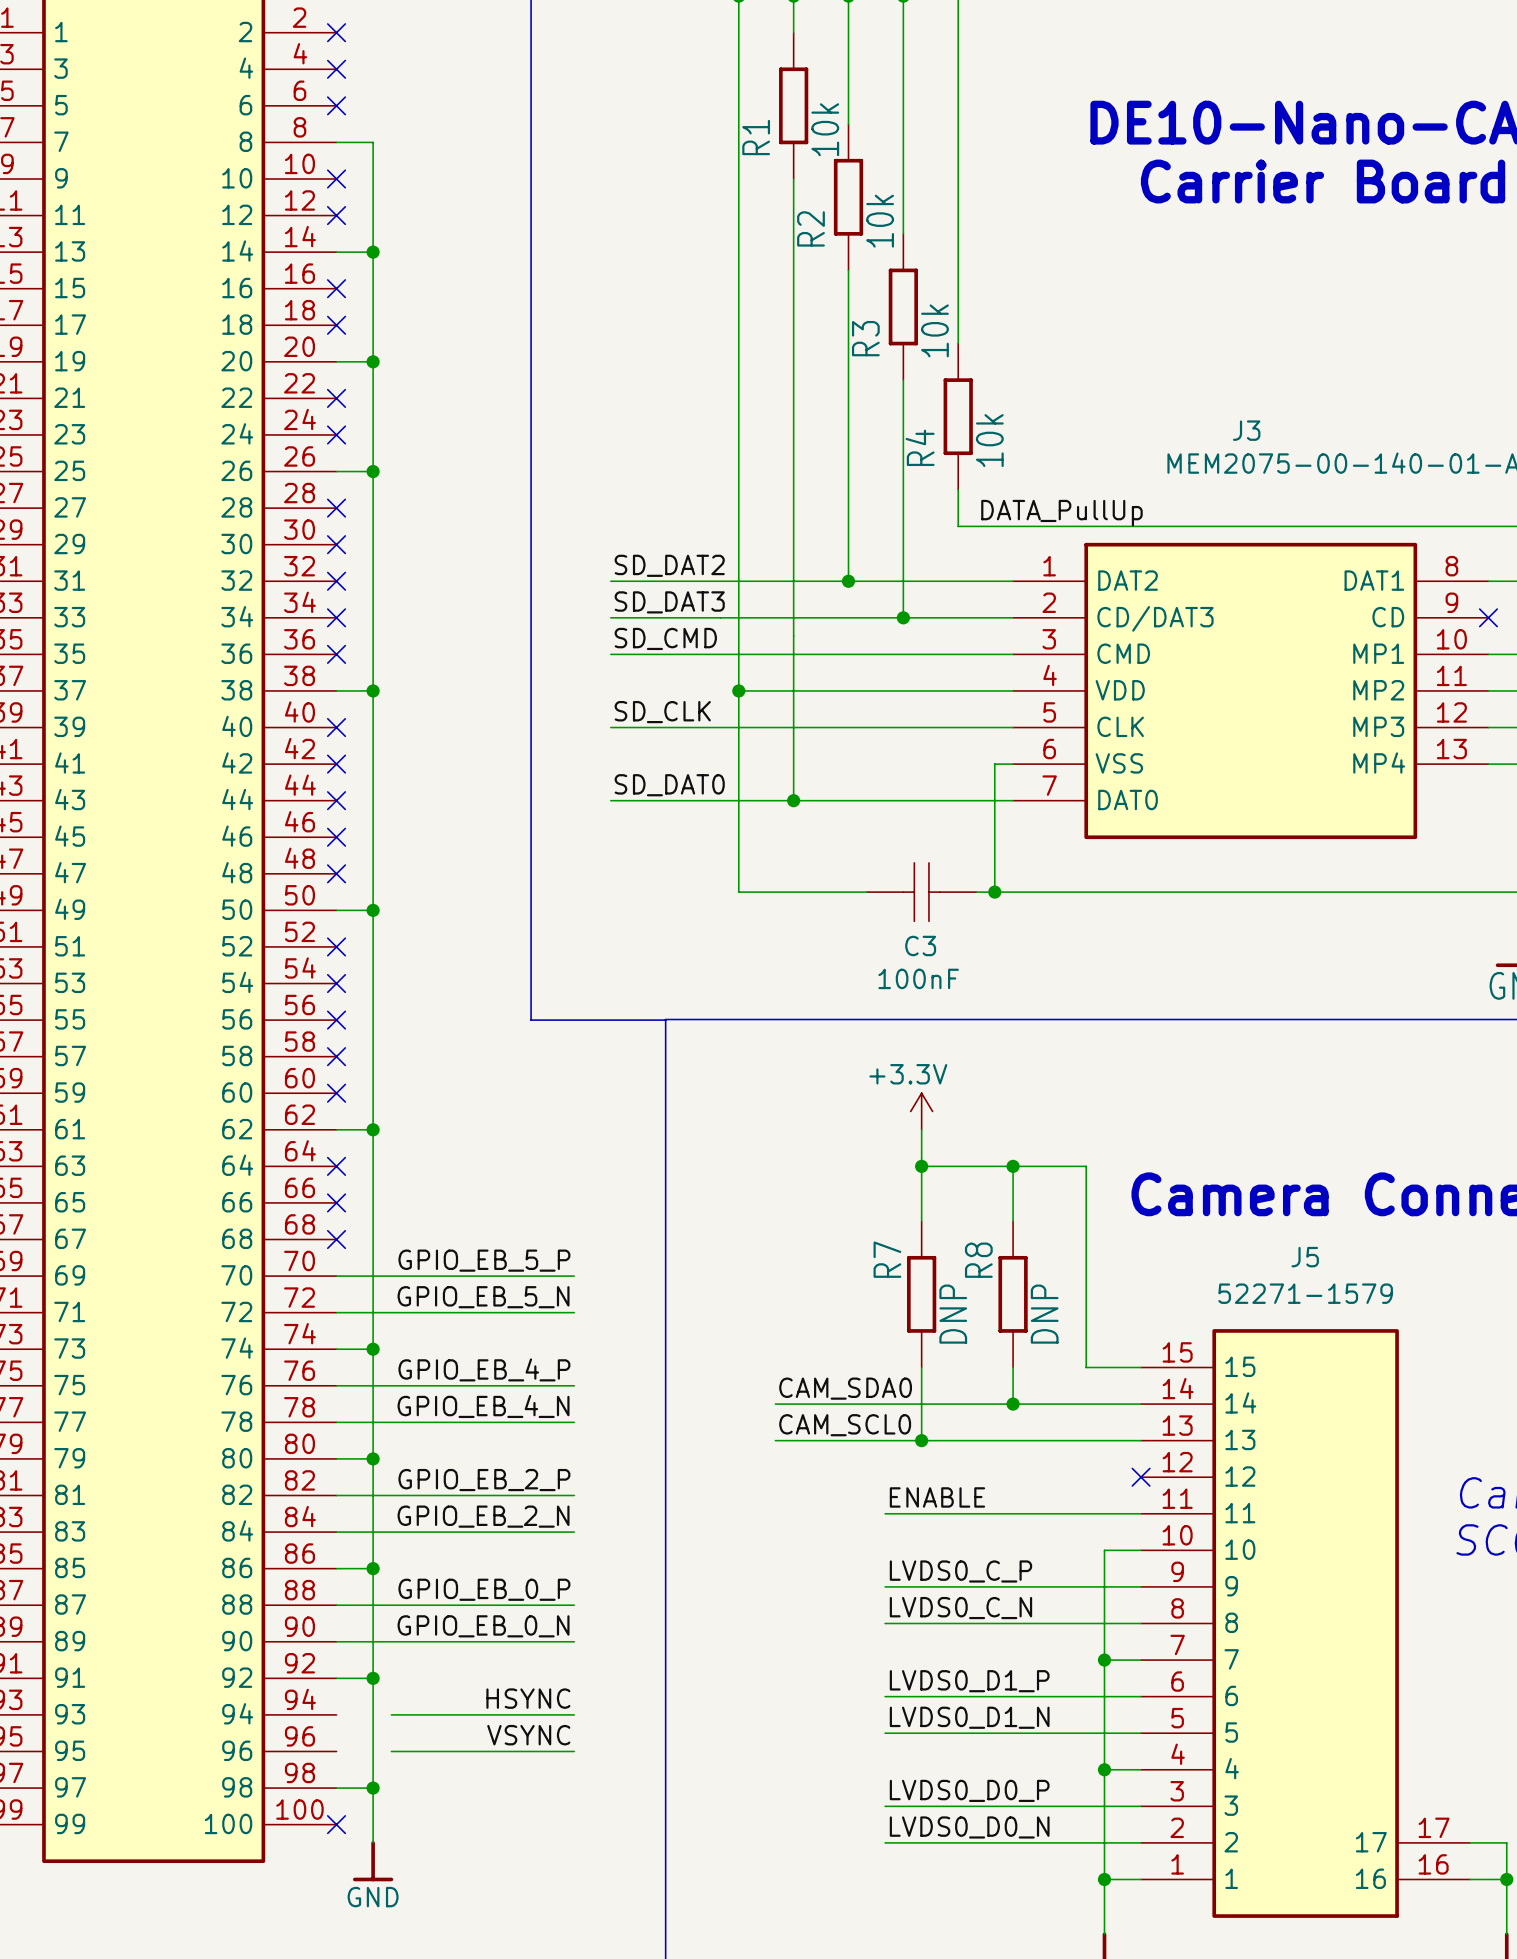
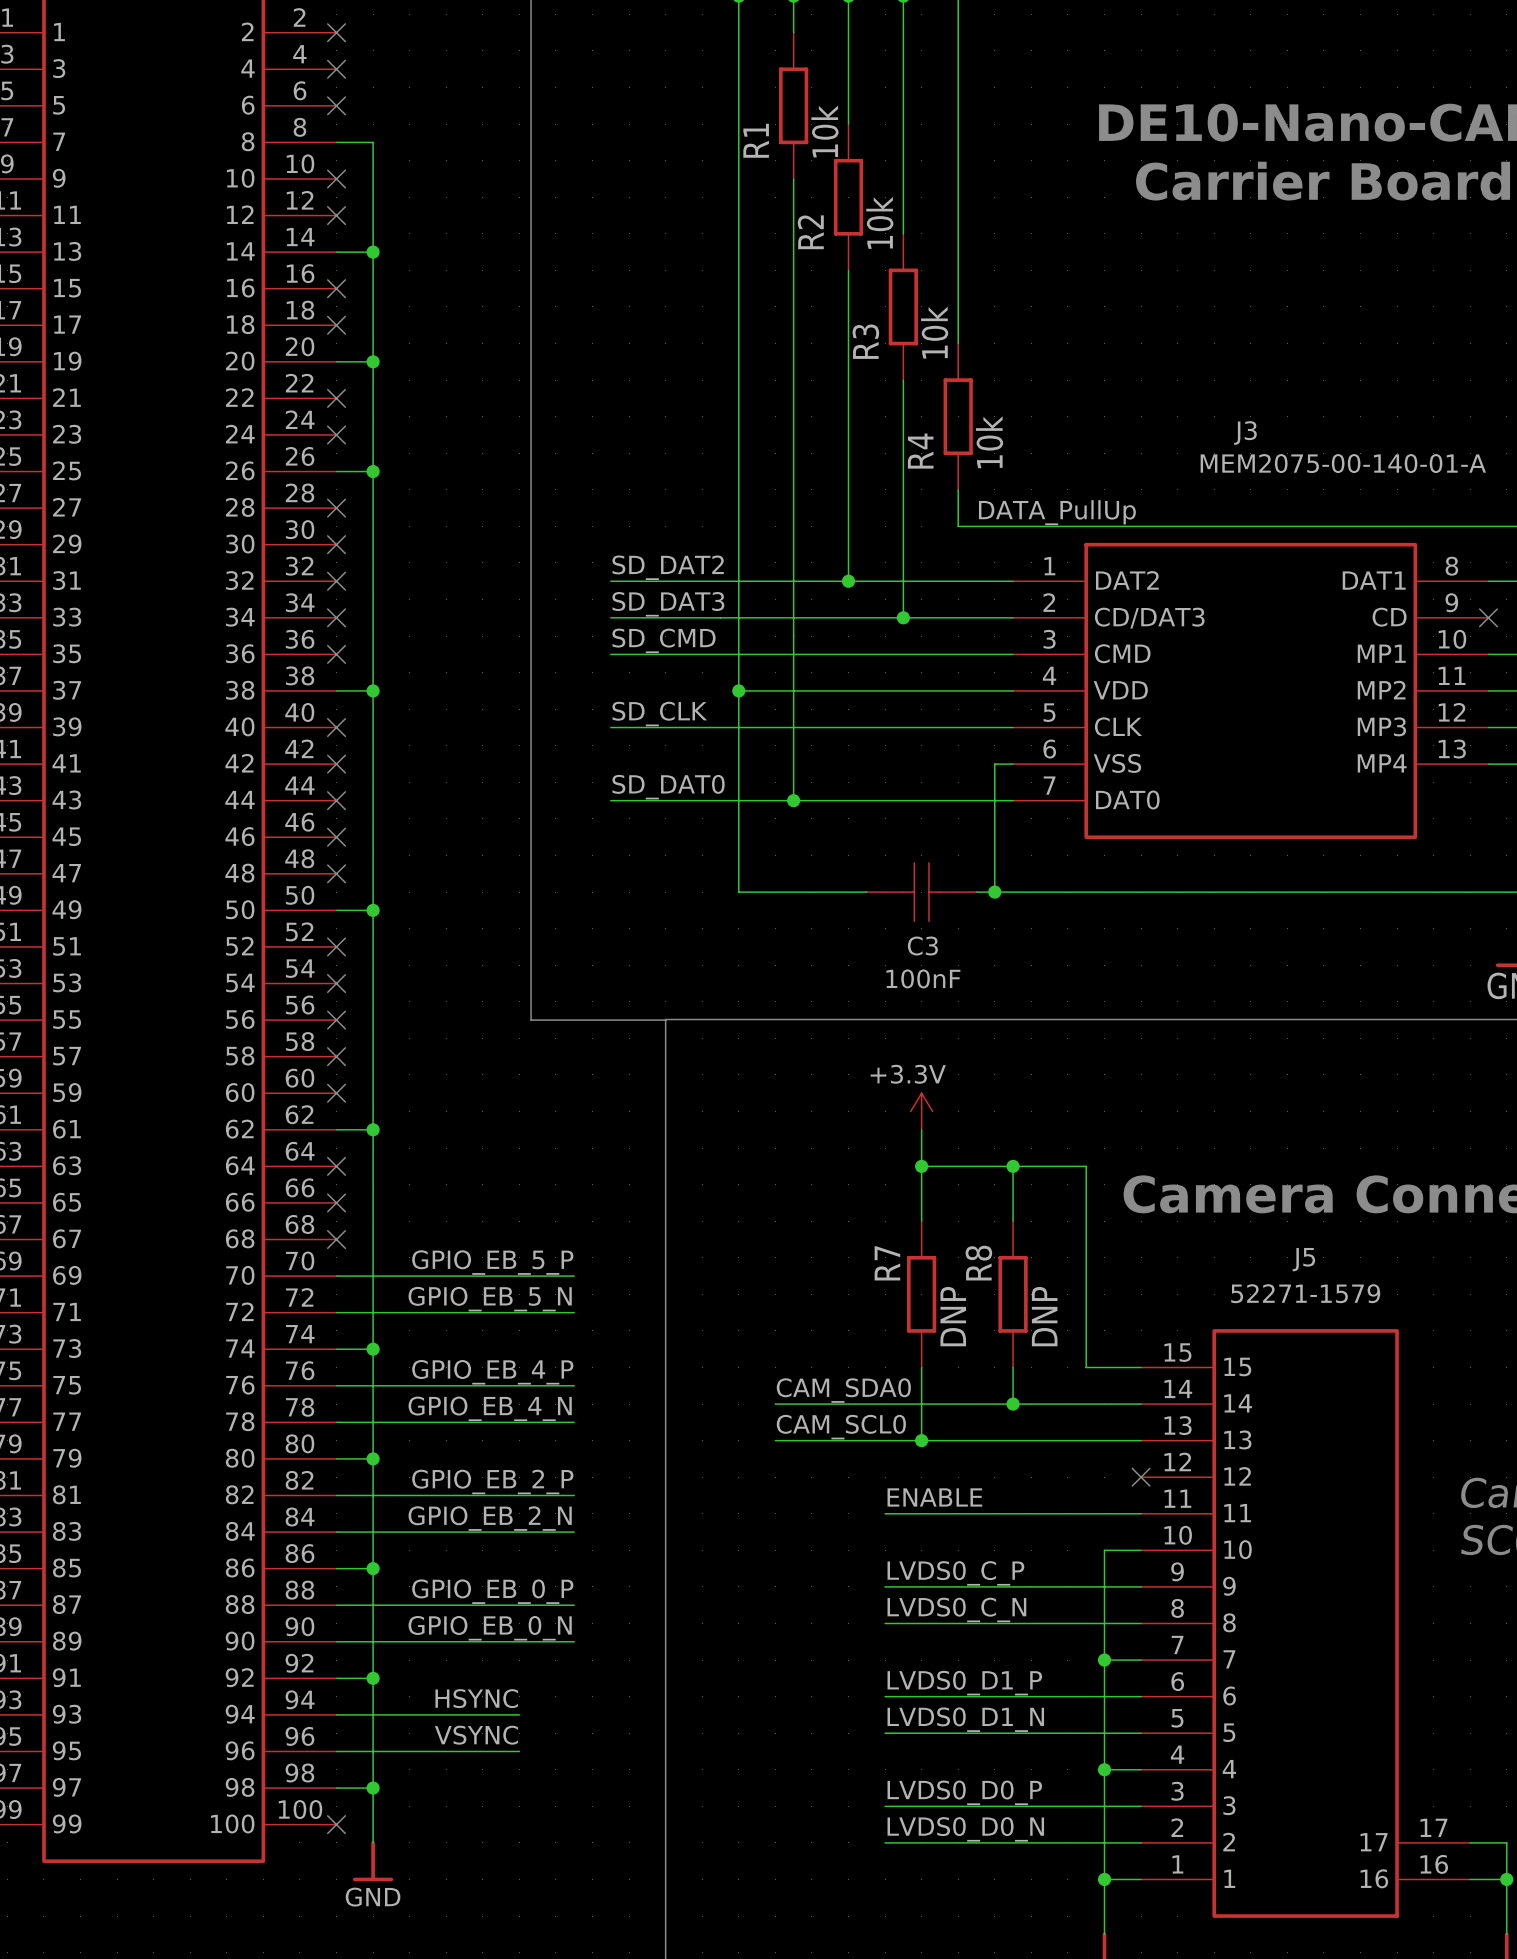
label position: HSYNC (528, 1698) -> HSYNC (476, 1698)
wire: (519, 1714) (574, 1714) -> (336, 1714) (391, 1714)
label position: VSYNC (528, 1735) -> VSYNC (476, 1735)
wire: (519, 1751) (574, 1751) -> (336, 1751) (391, 1751)

